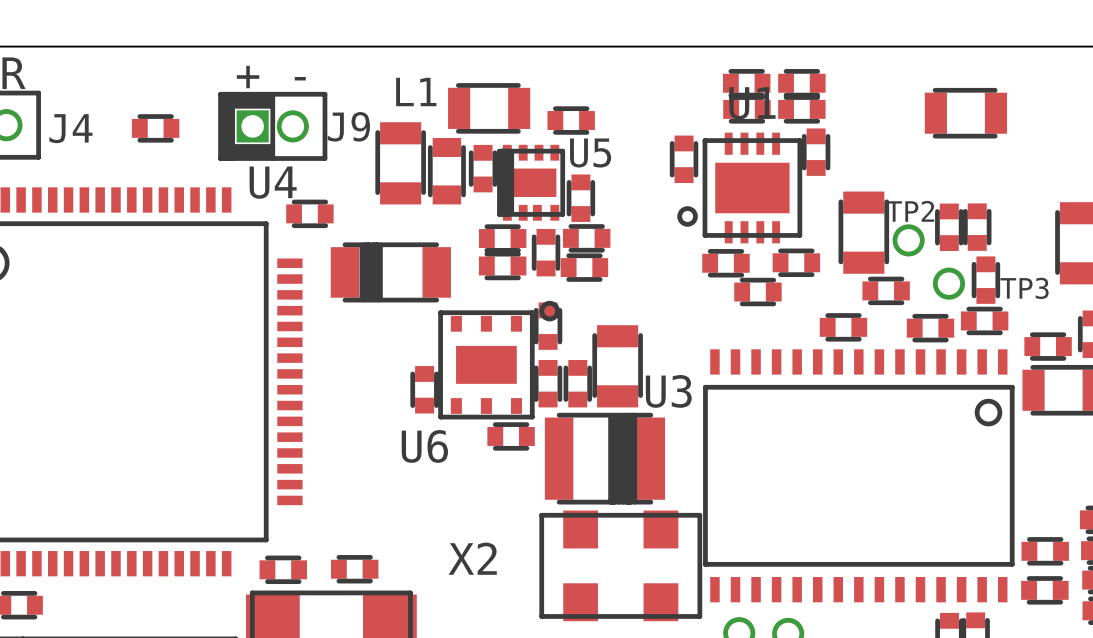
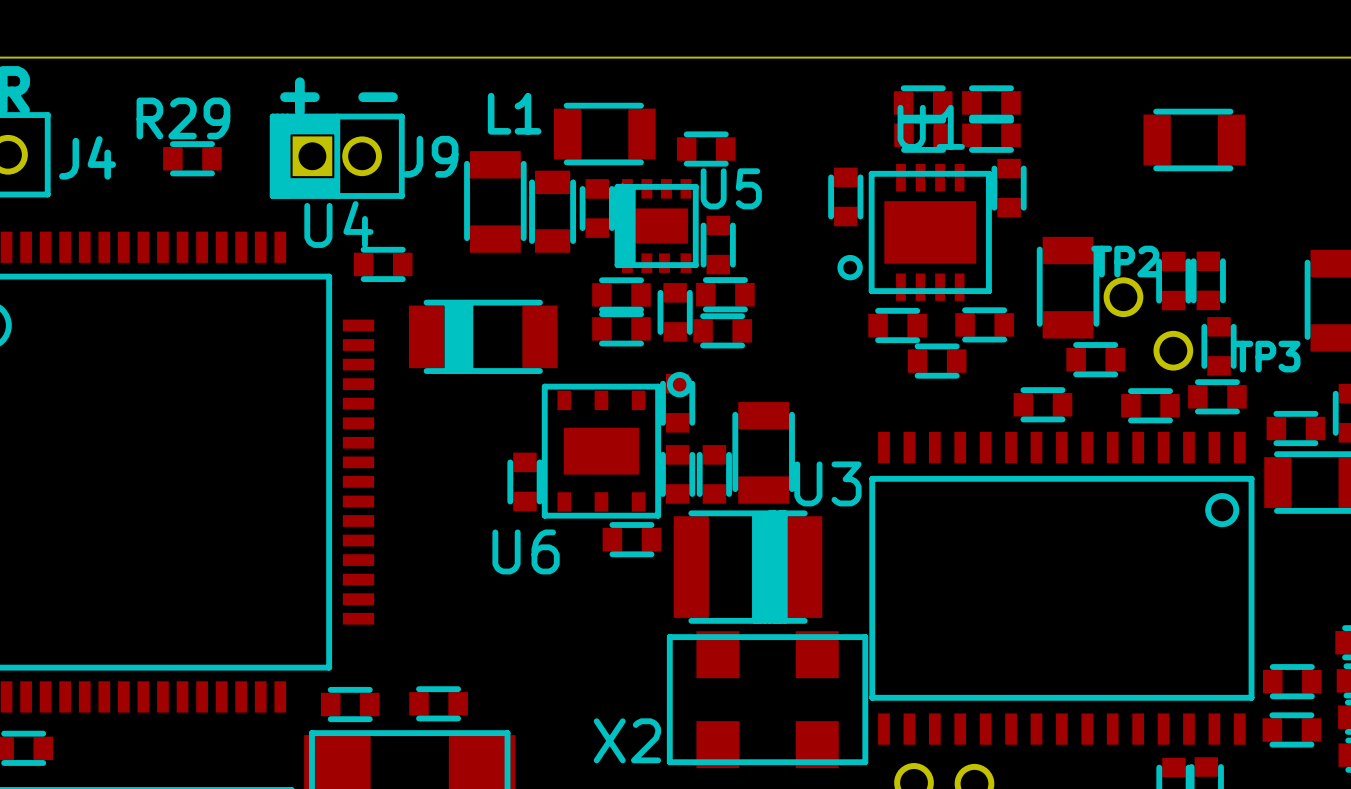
R29 name: none -> R29 (183, 118)
X2 name position: X2 (472, 558) -> X2 (627, 740)

